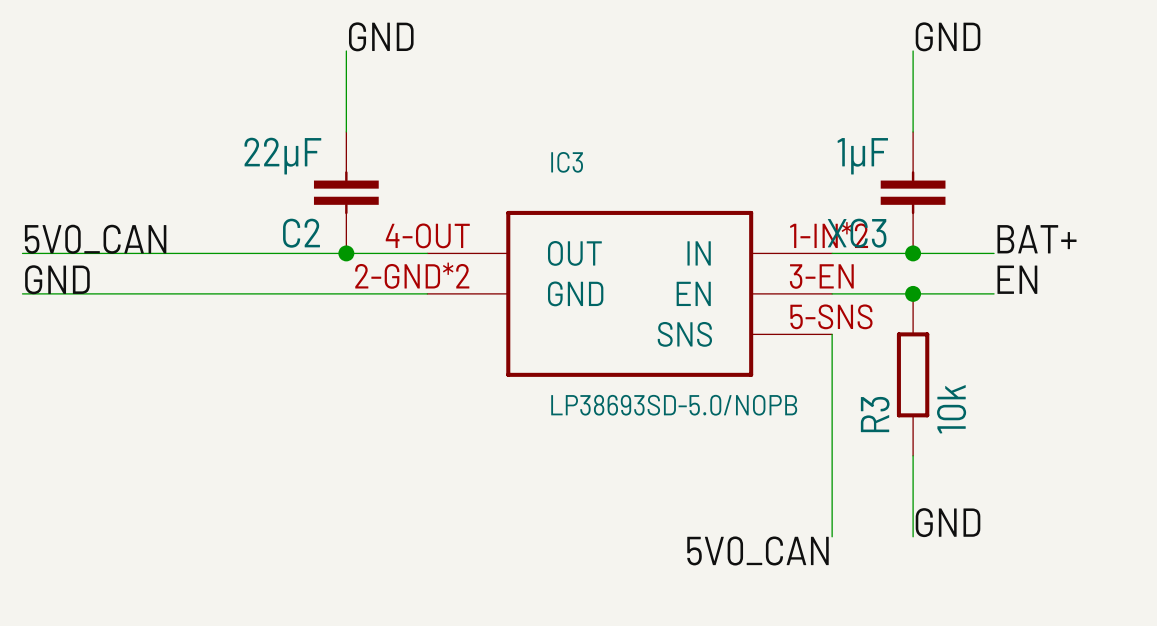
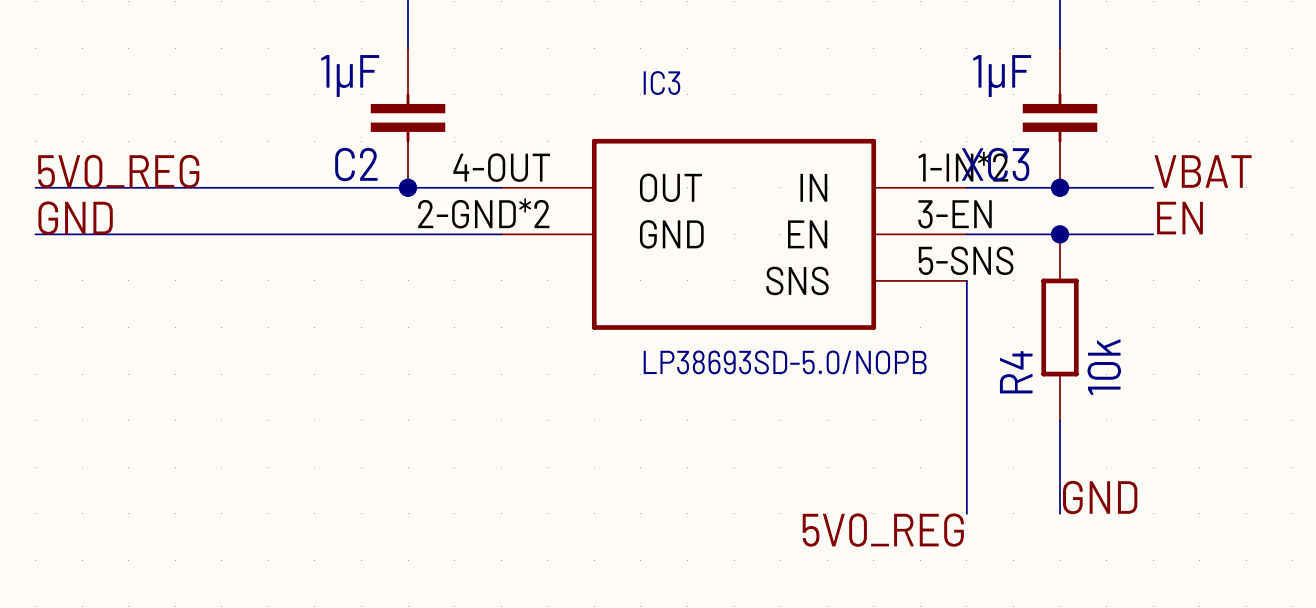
C2 value: 22μF (282, 156) -> 1μF (350, 76)
label: 5V0_CAN (95, 239) -> 5V0_REG (118, 171)
label: BAT+ (1037, 239) -> VBAT (1203, 171)
R3 name: R3 (875, 414) -> R4 (1016, 372)
label: 5V0_CAN (757, 550) -> 5V0_REG (883, 530)

